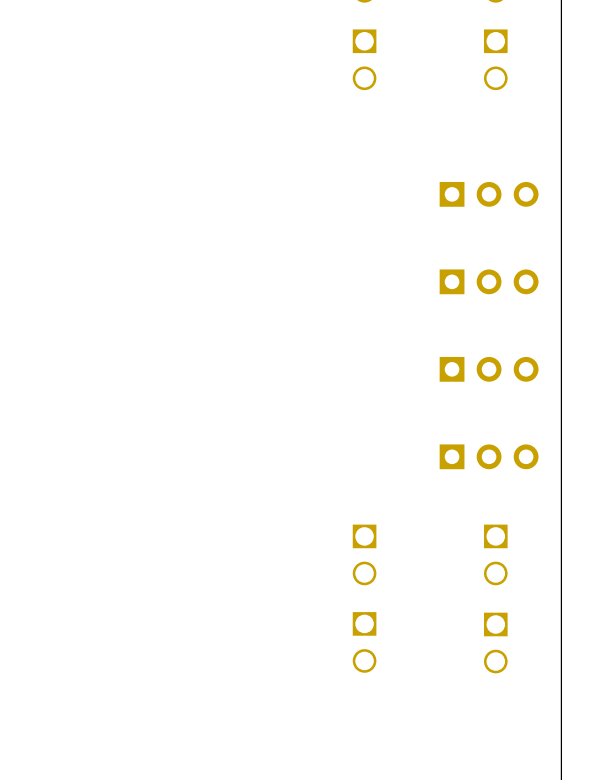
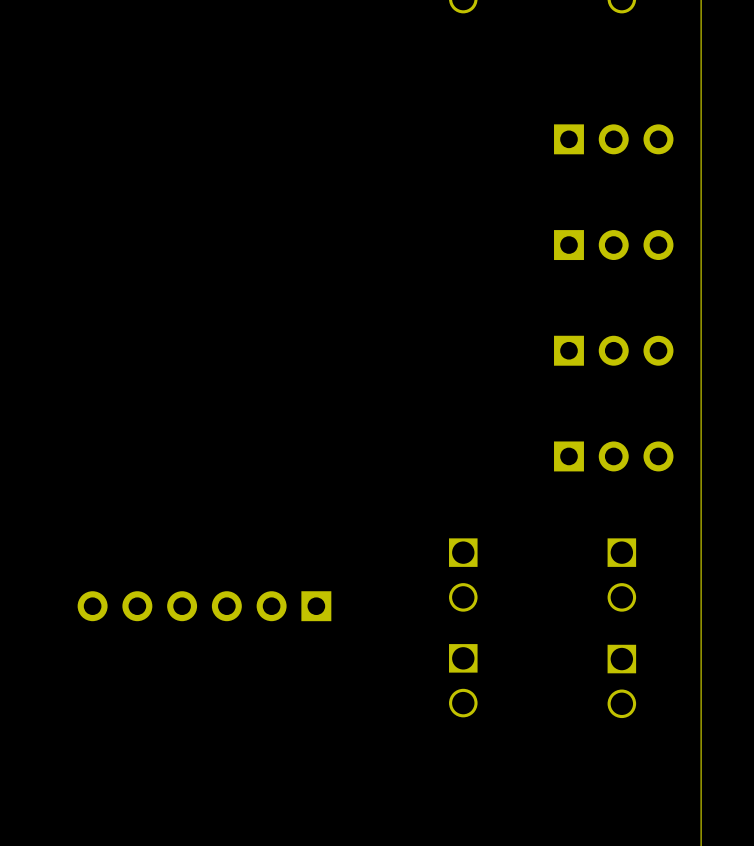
part: none -> (204, 606)

